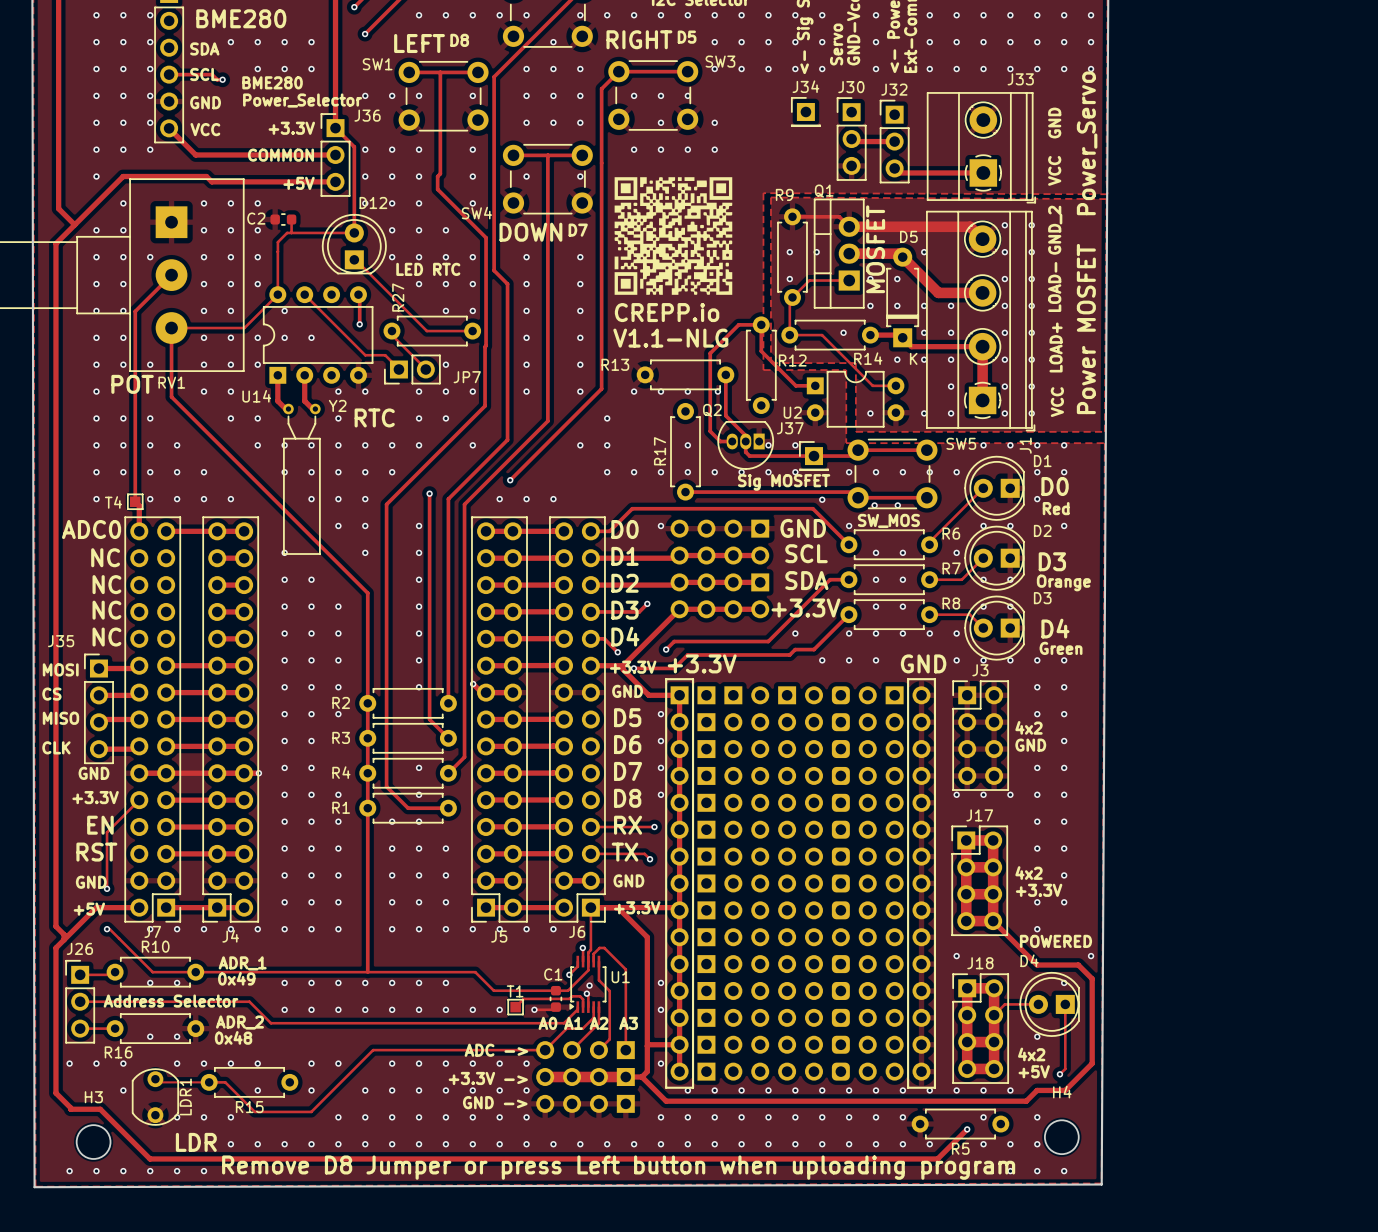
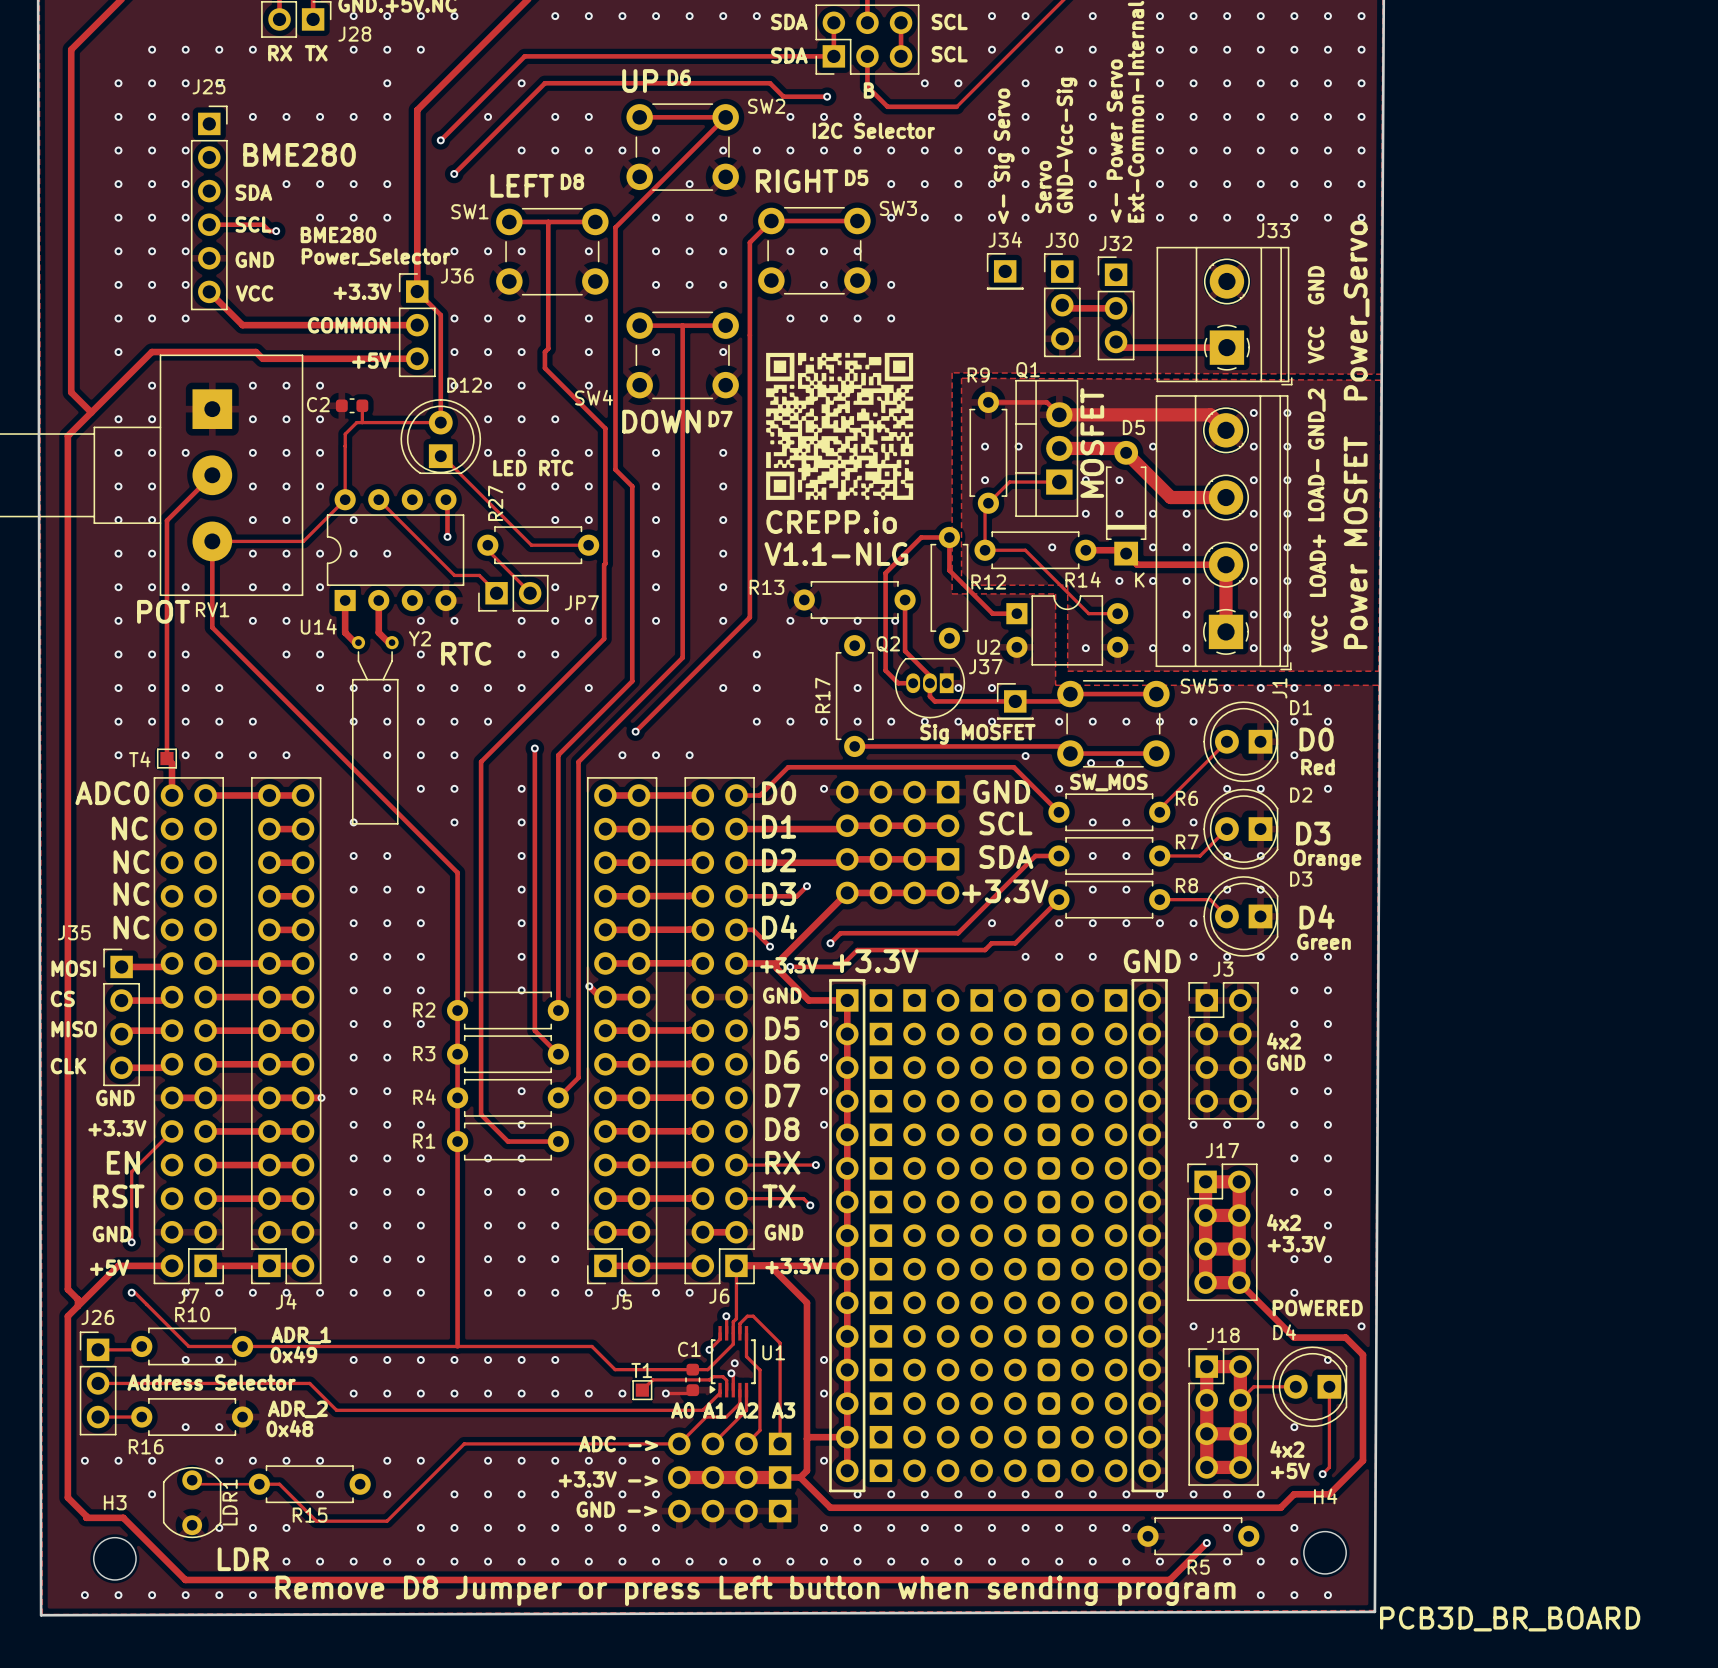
text: Remove D8 Jumper or press Left button when uploading program (618, 1167) -> Remove D8 Jumper or press Left button when sending program (755, 1590)
text: none -> PCB3D_BR_BOARD (1510, 1618)

